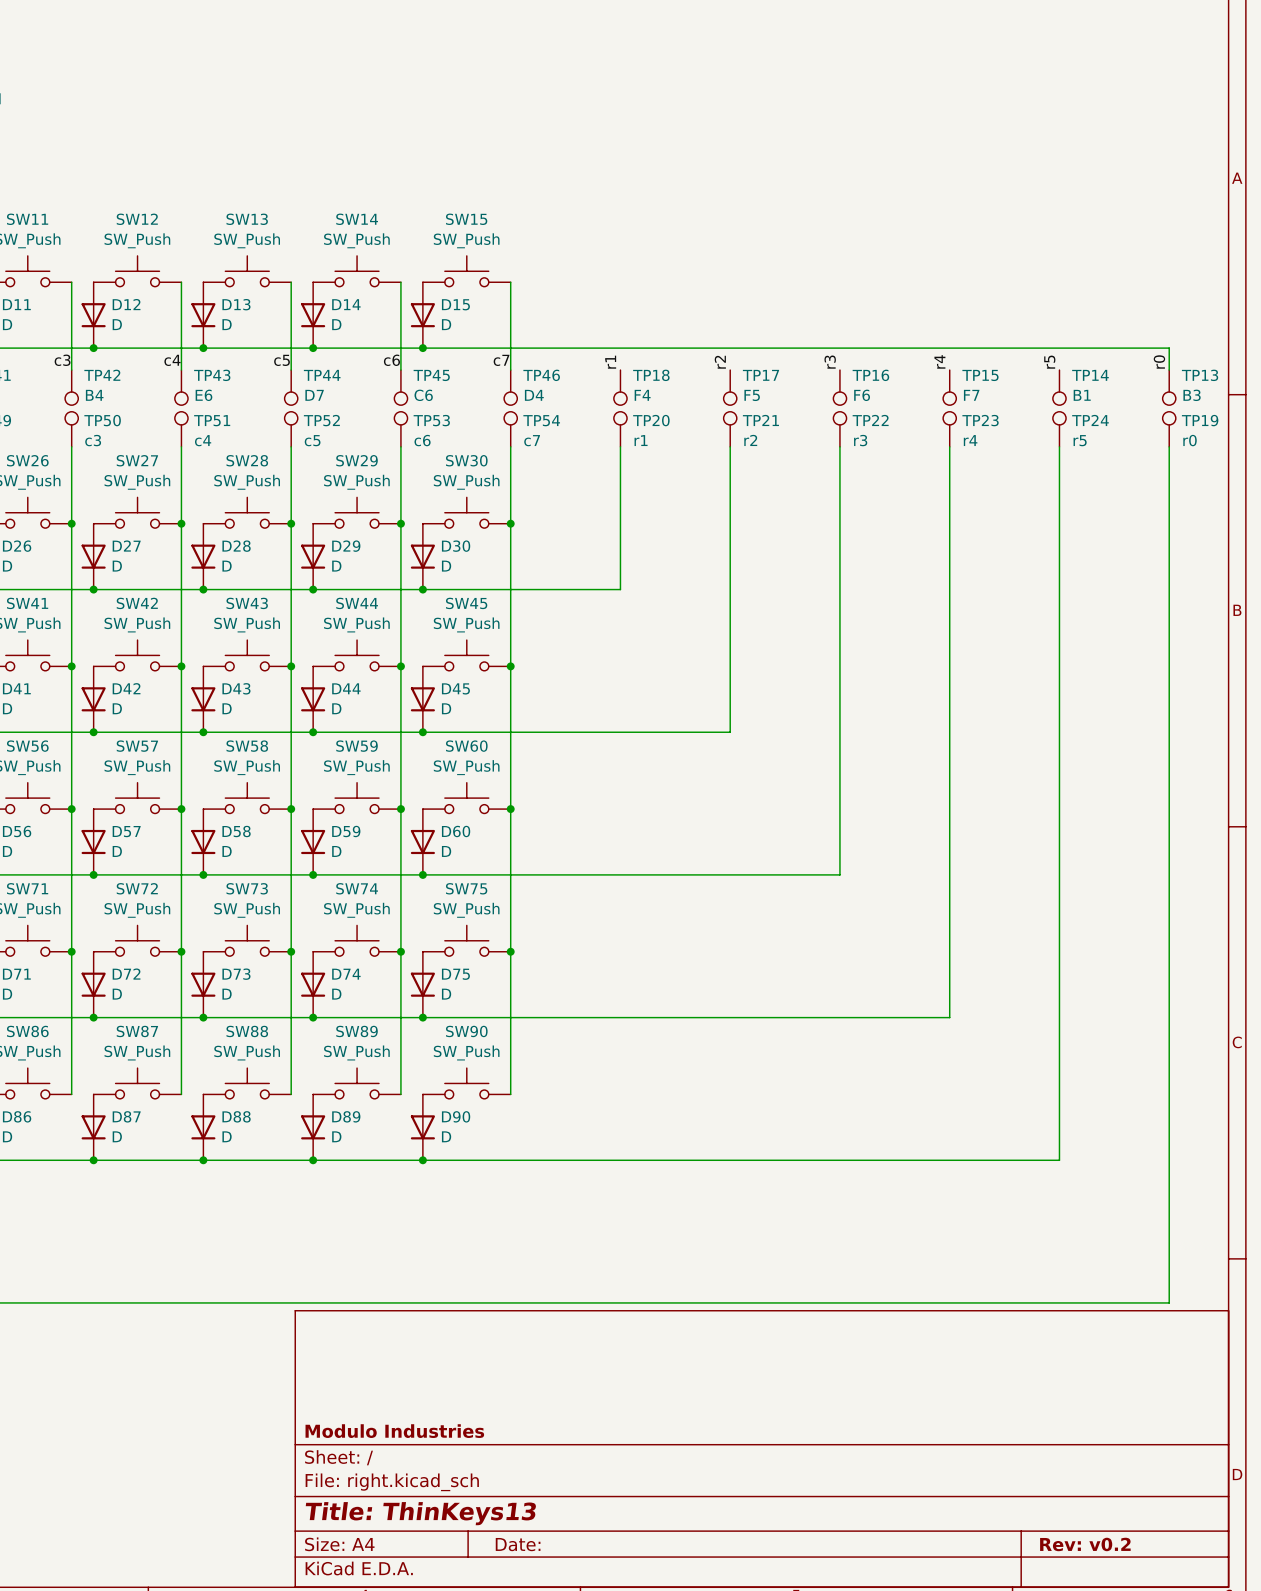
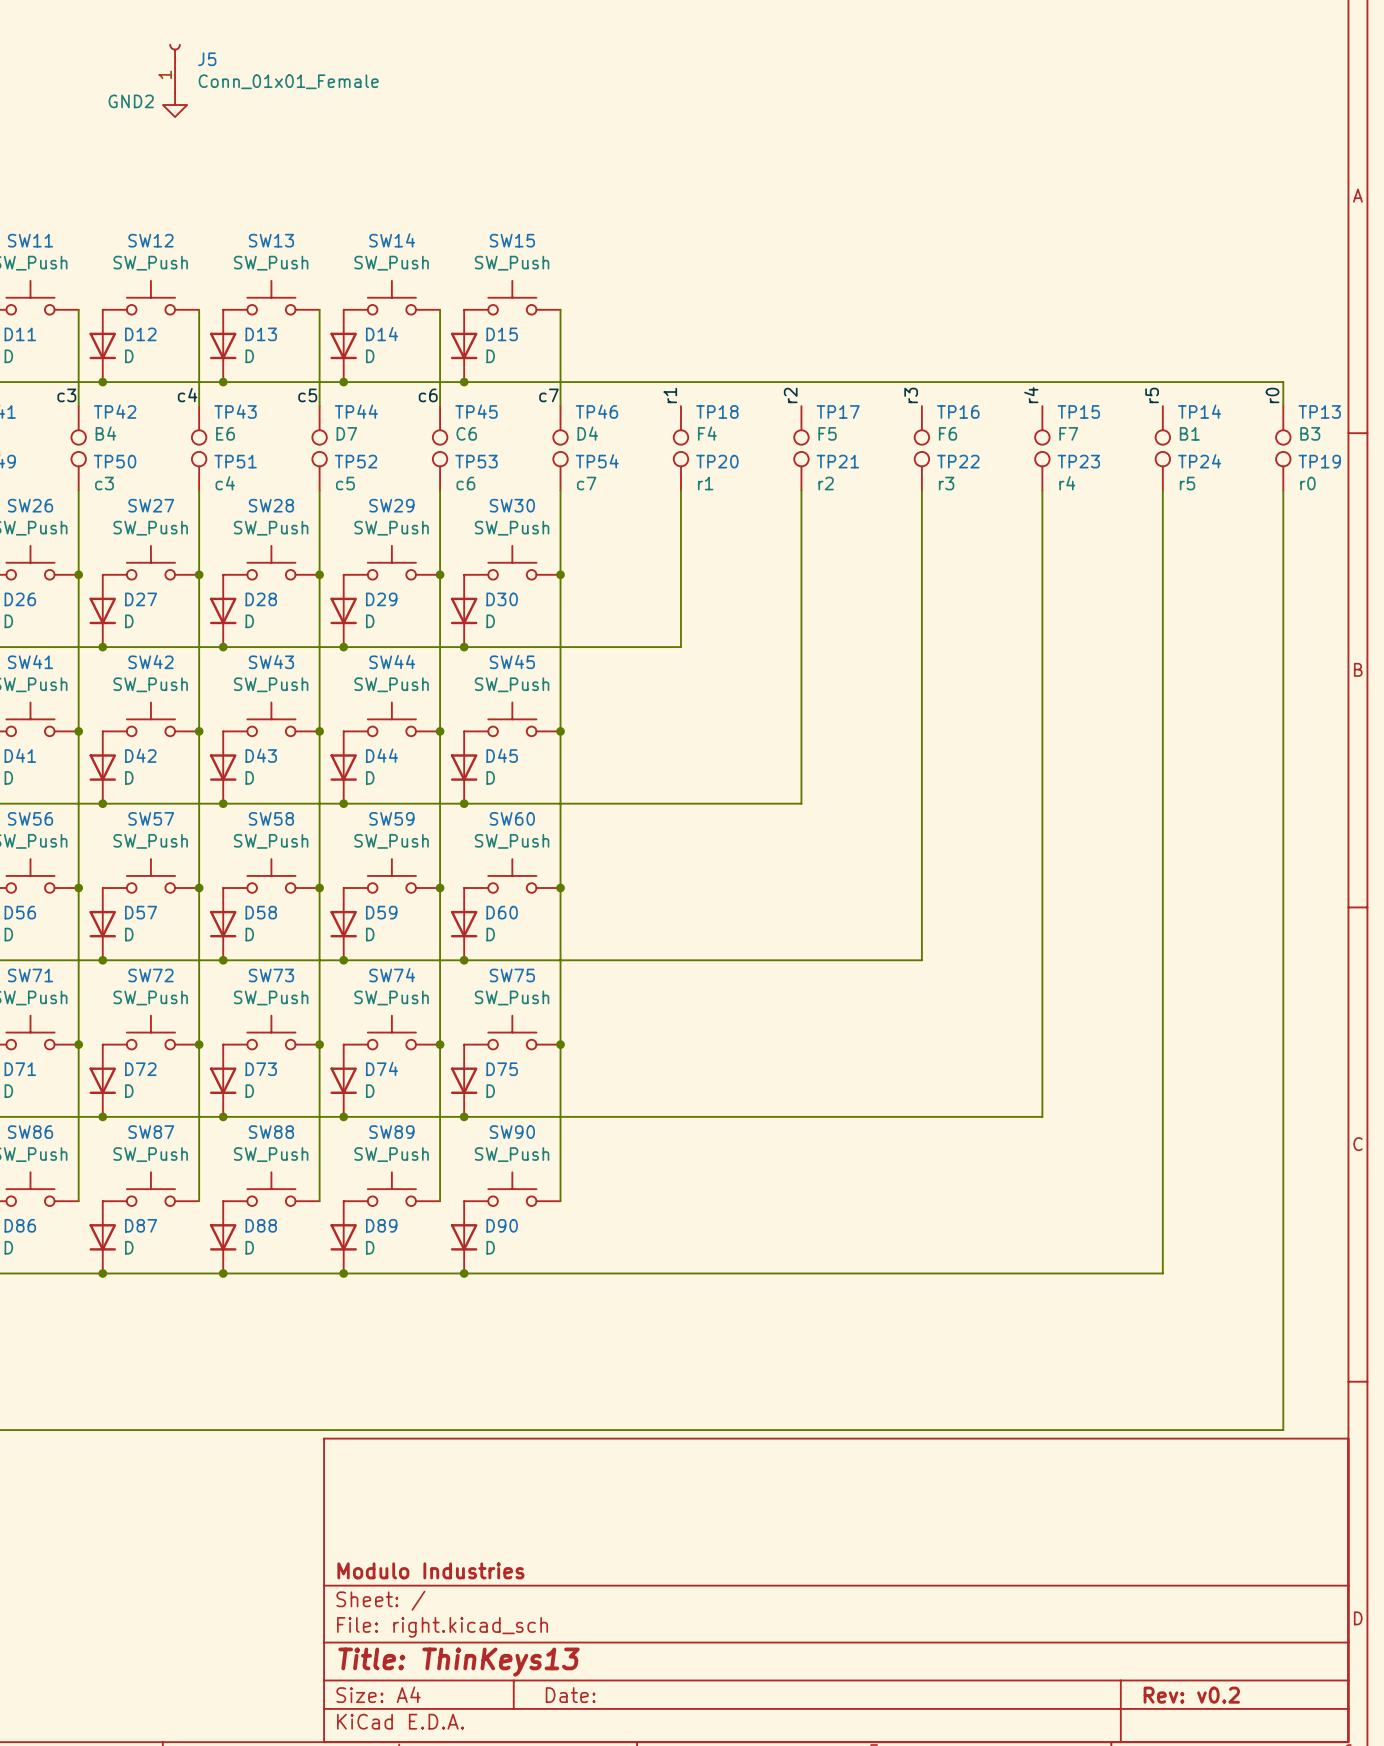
J5: none -> Conn_01x01_Female (175, 68)
power symbol: none -> GND2 (175, 105)

